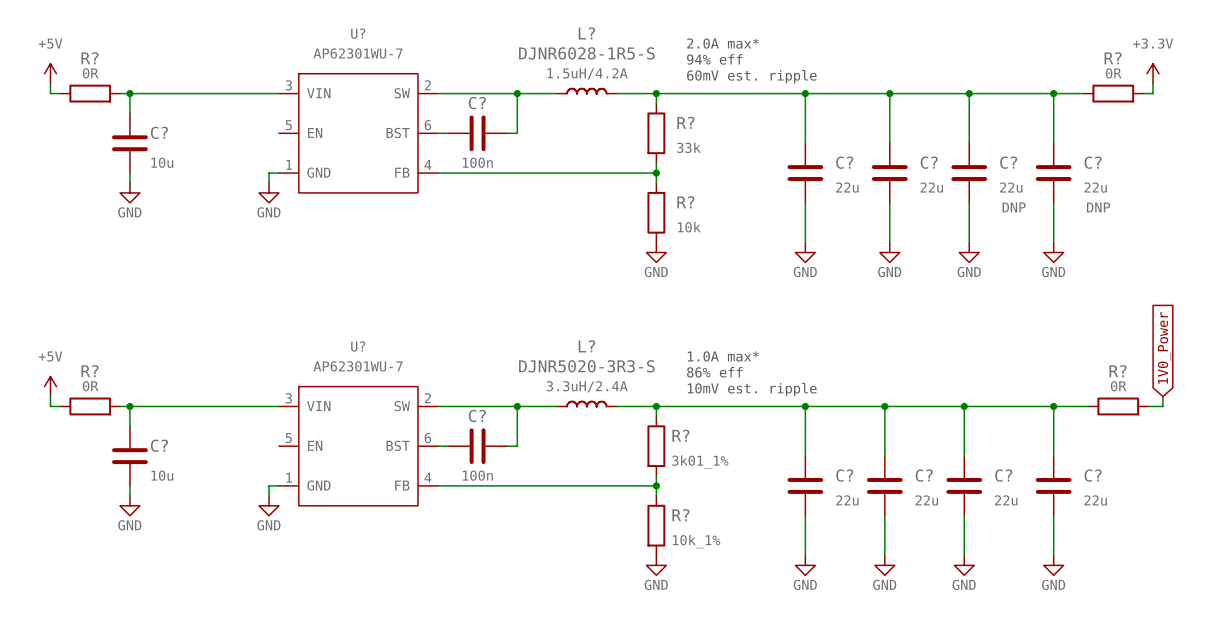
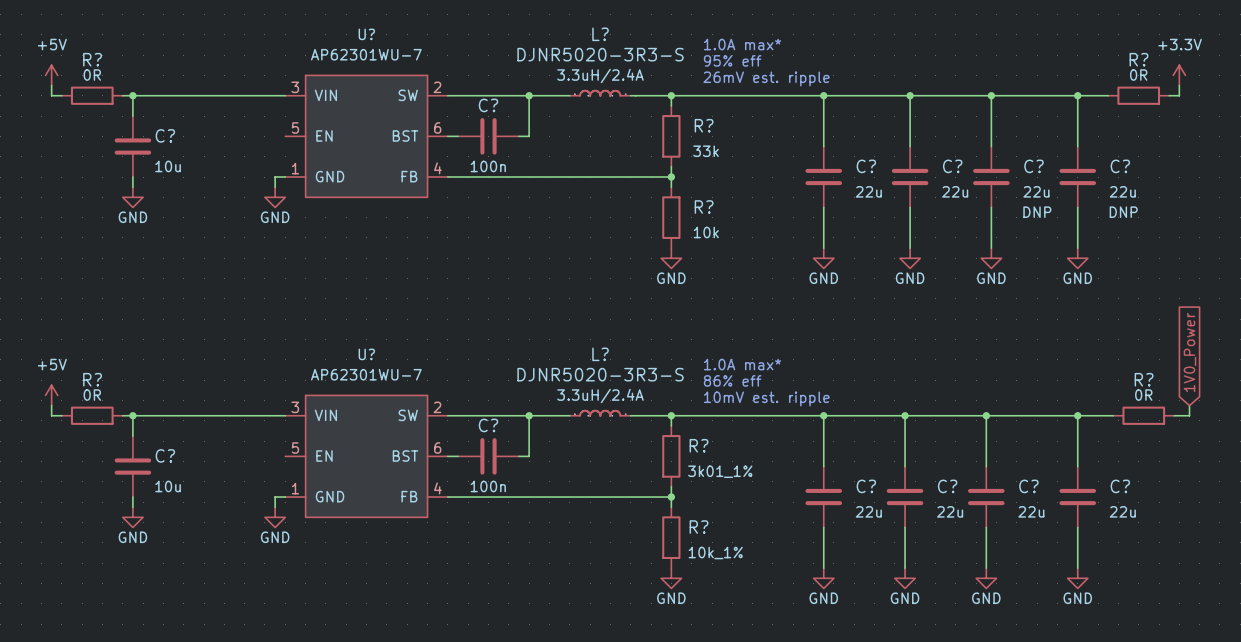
text: 2.0A max* (723, 43) -> 1.0A max* (742, 44)
L? value: DJNR6028-1R5-S (586, 53) -> DJNR5020-3R3-S (600, 54)
text: 94% eff (714, 59) -> 95% eff (732, 60)
L? text: 1.5uH/4.2A (587, 73) -> 3.3uH/2.4A (600, 75)
text: 60mV est. ripple (751, 76) -> 26mV est. ripple (766, 78)

